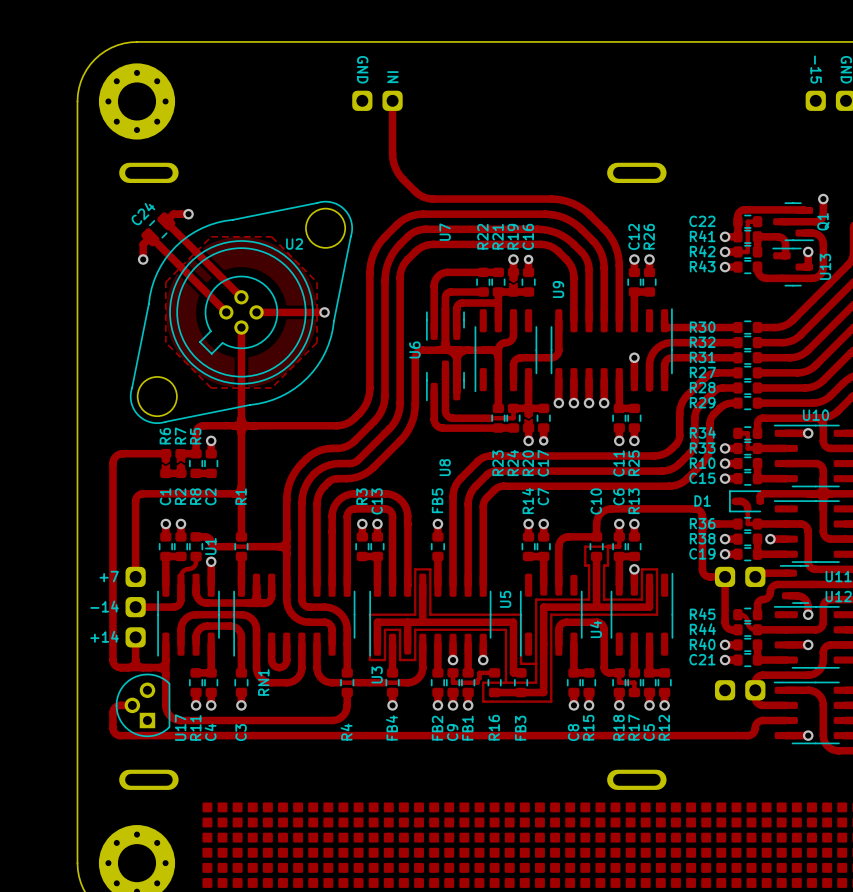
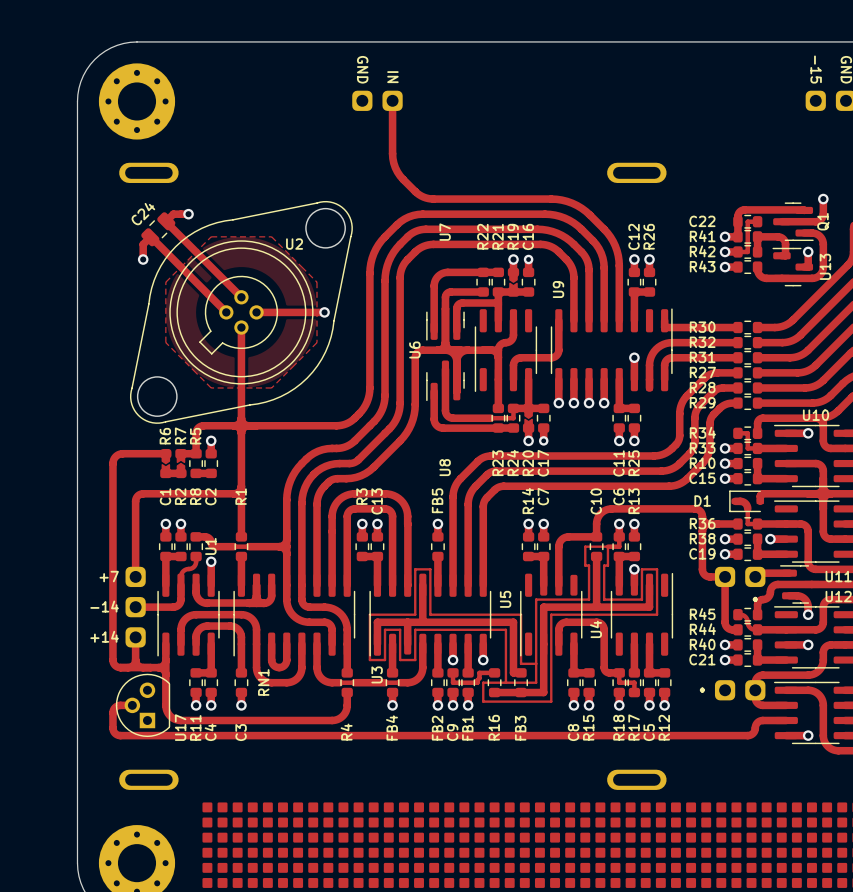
text: none -> . (755, 599)
text: none -> . (702, 690)

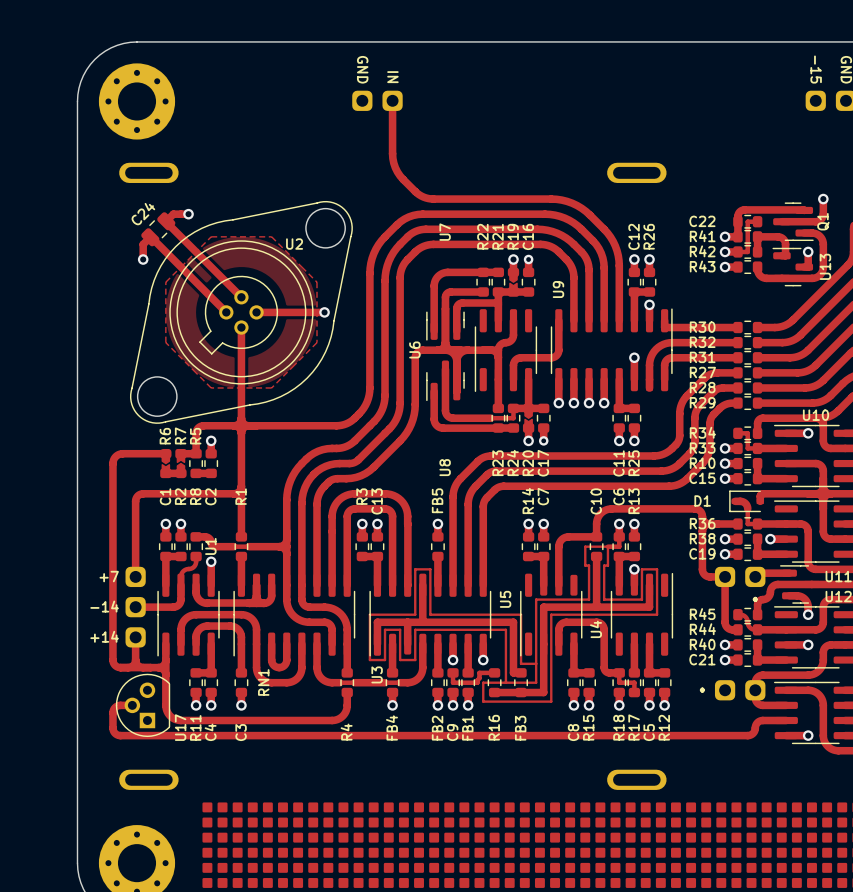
via: none -> (649, 304)

